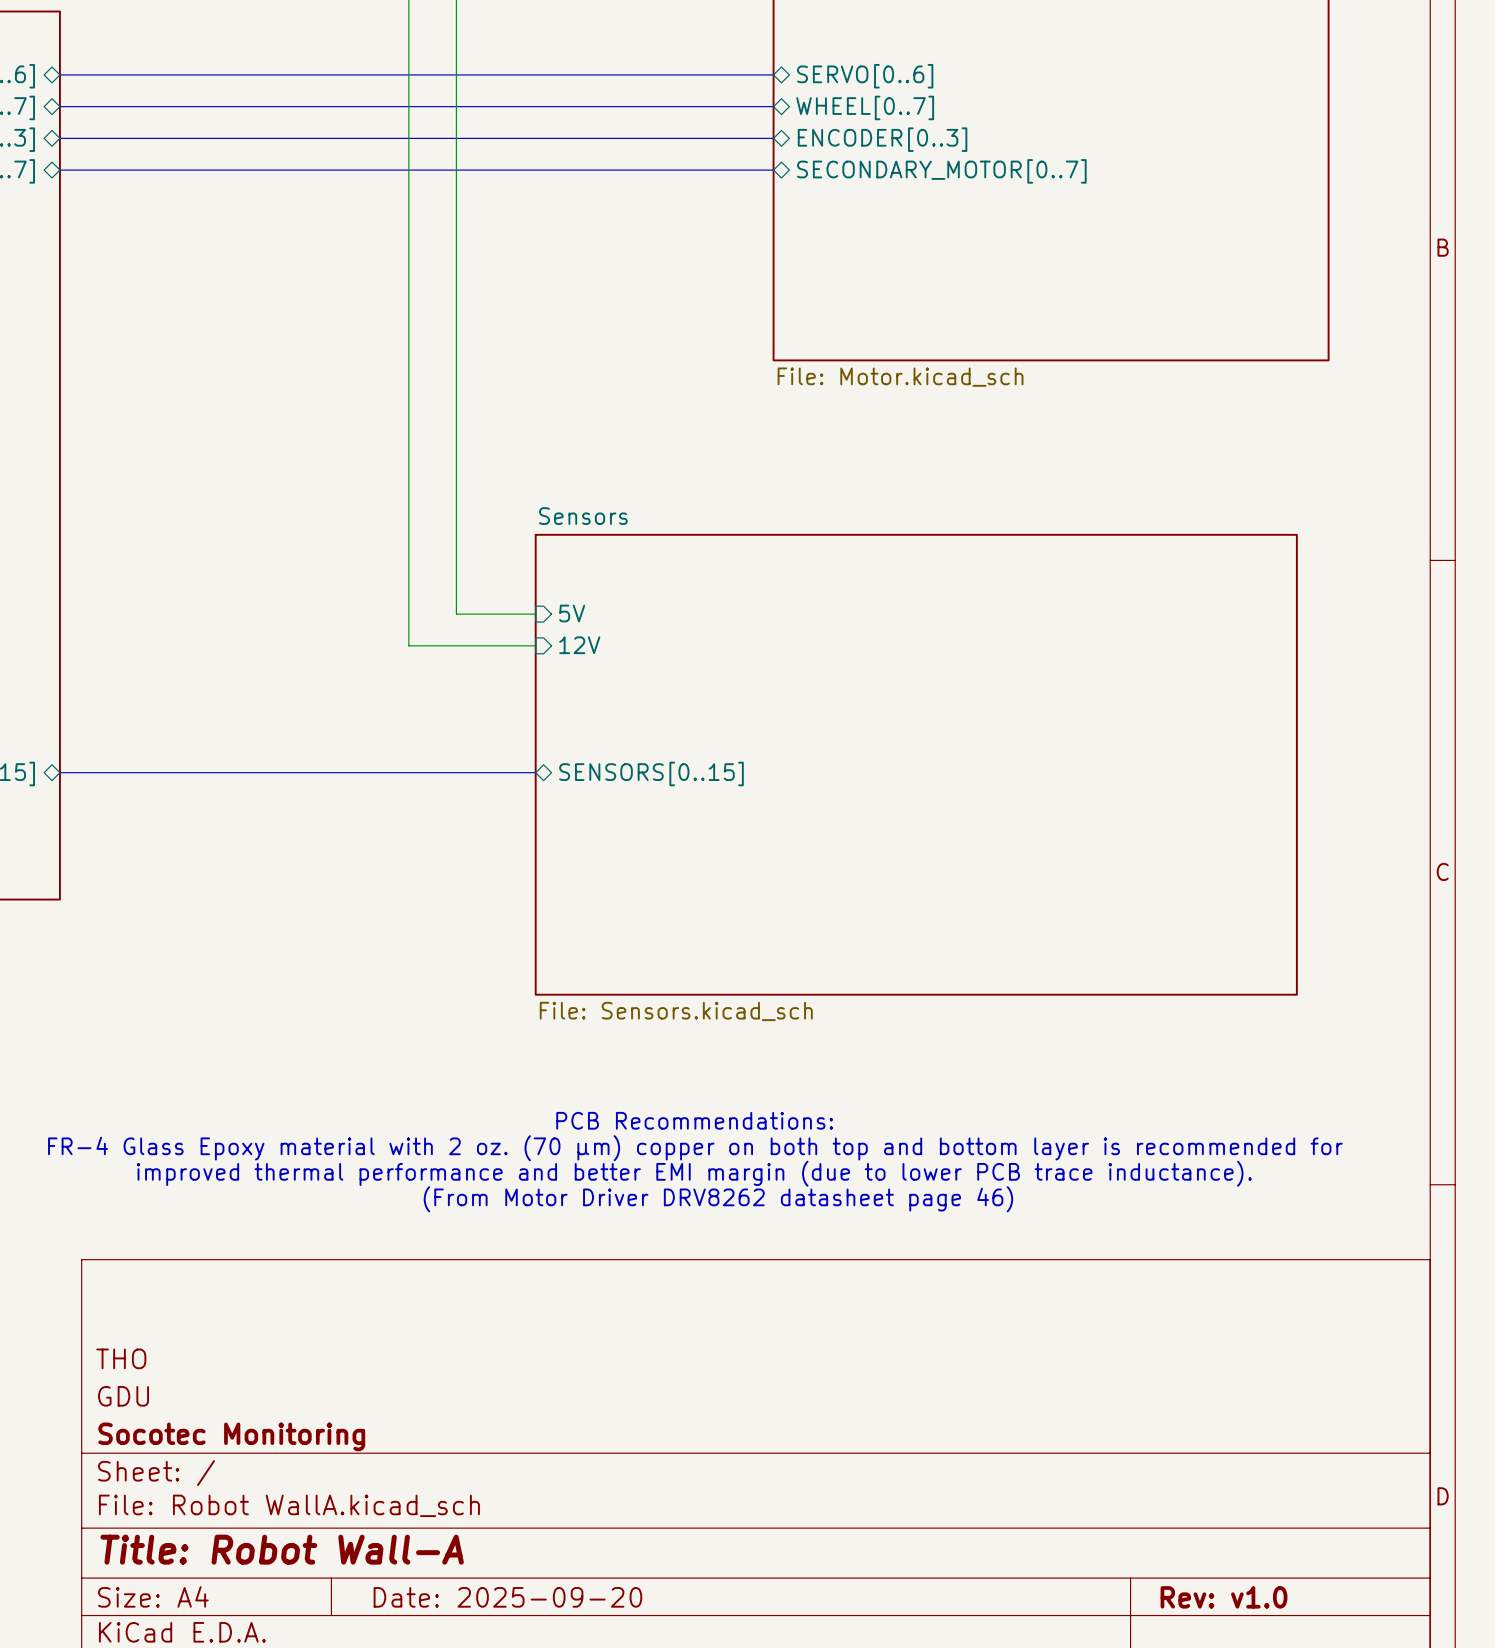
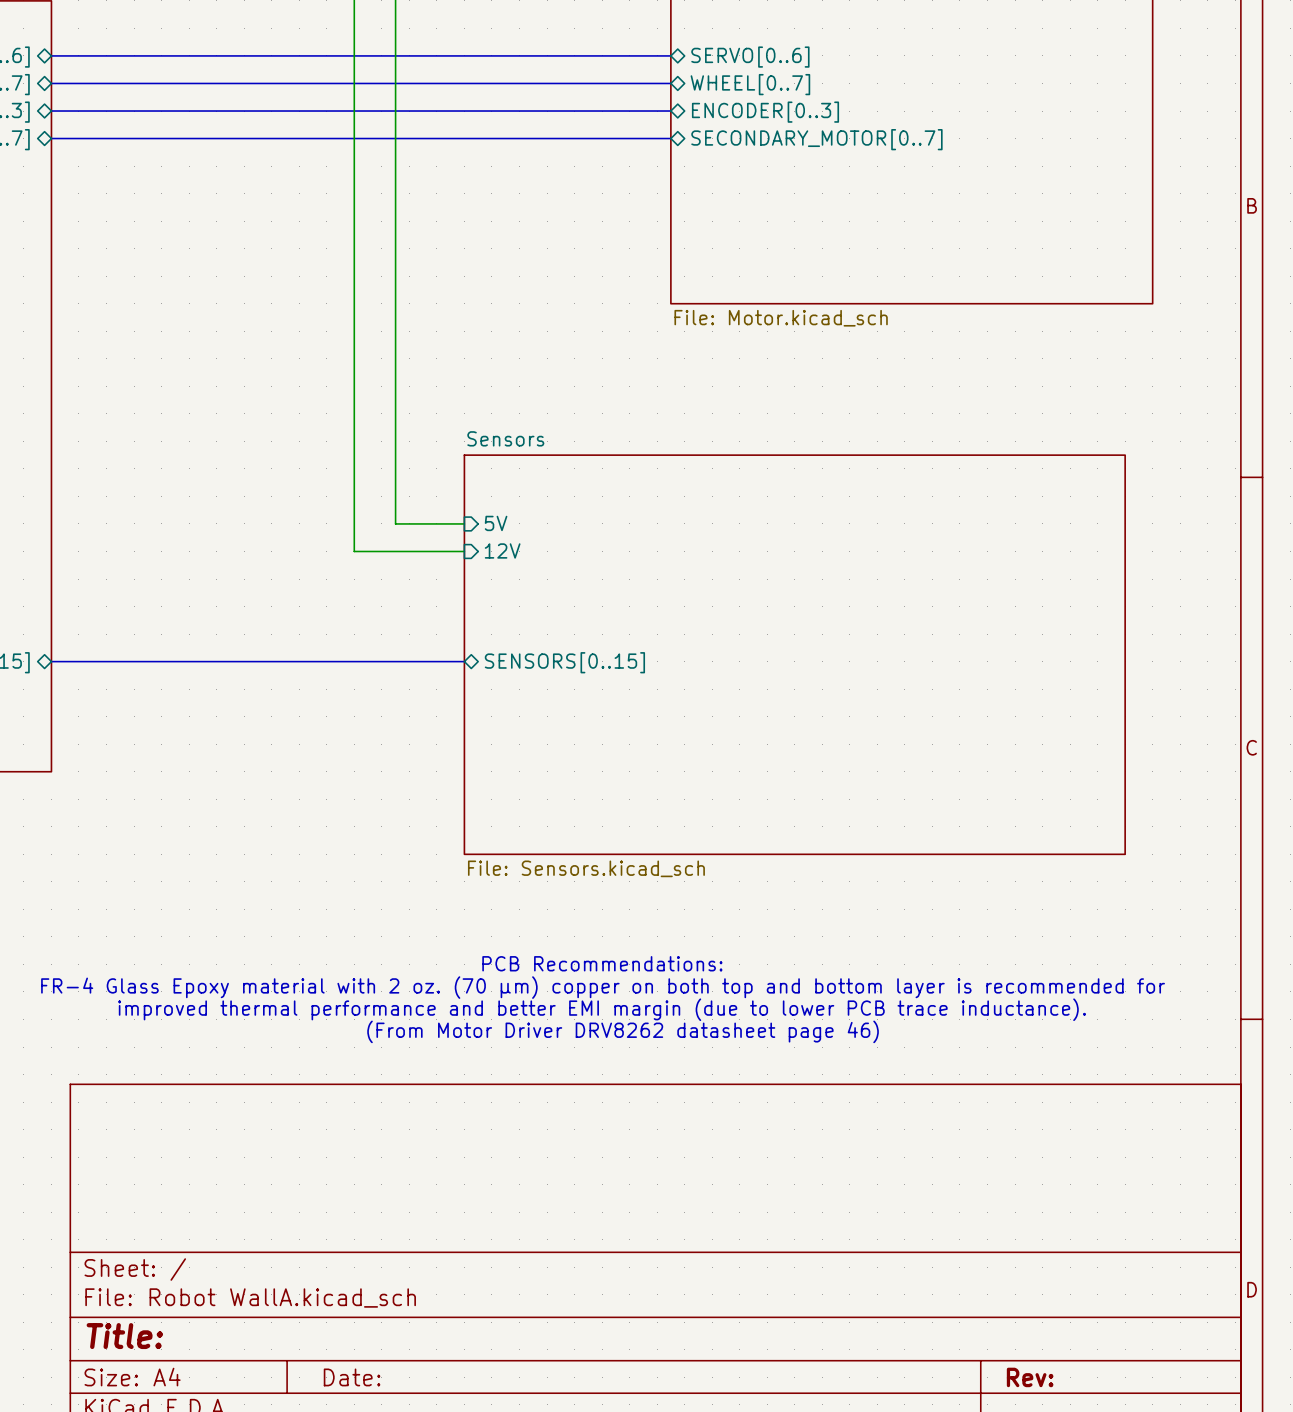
title block: THO (121, 1358) -> none
title block: GDU (123, 1396) -> none
title block: Socotec Monitoring (231, 1436) -> none
title block: Title: Robot Wall-A (282, 1549) -> Title: (124, 1336)
title block: Date: 2025-09-20 (507, 1597) -> Date: (352, 1377)
title block: Rev: v1.0 (1223, 1597) -> Rev: (1030, 1377)

